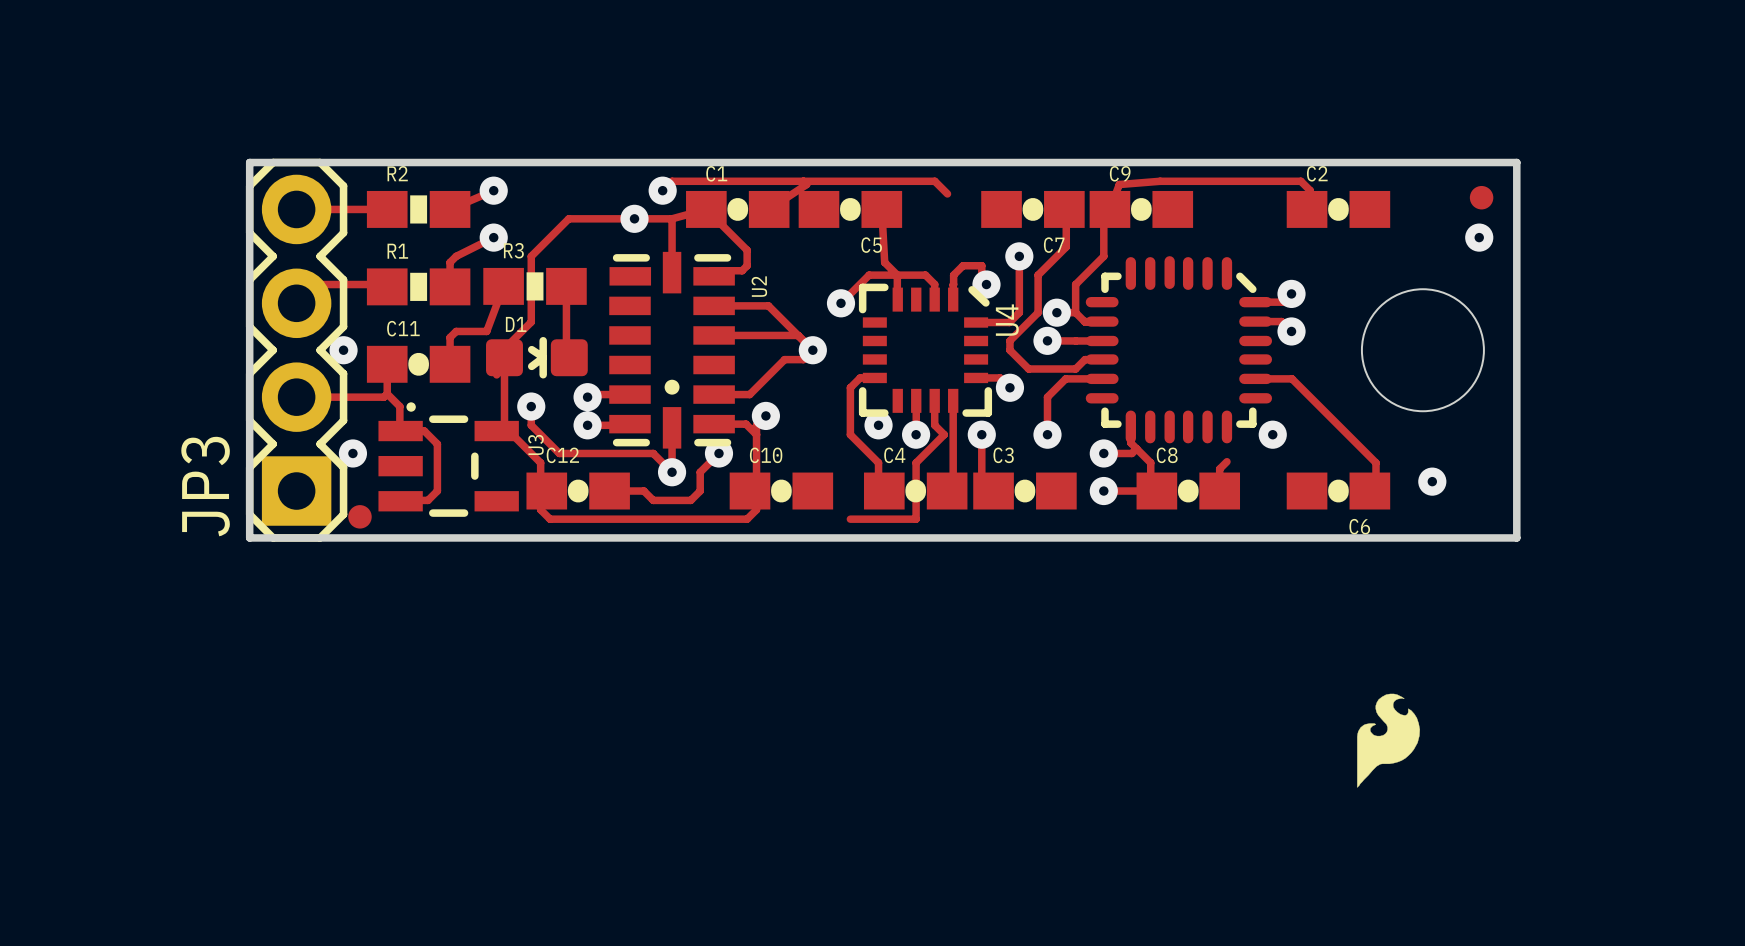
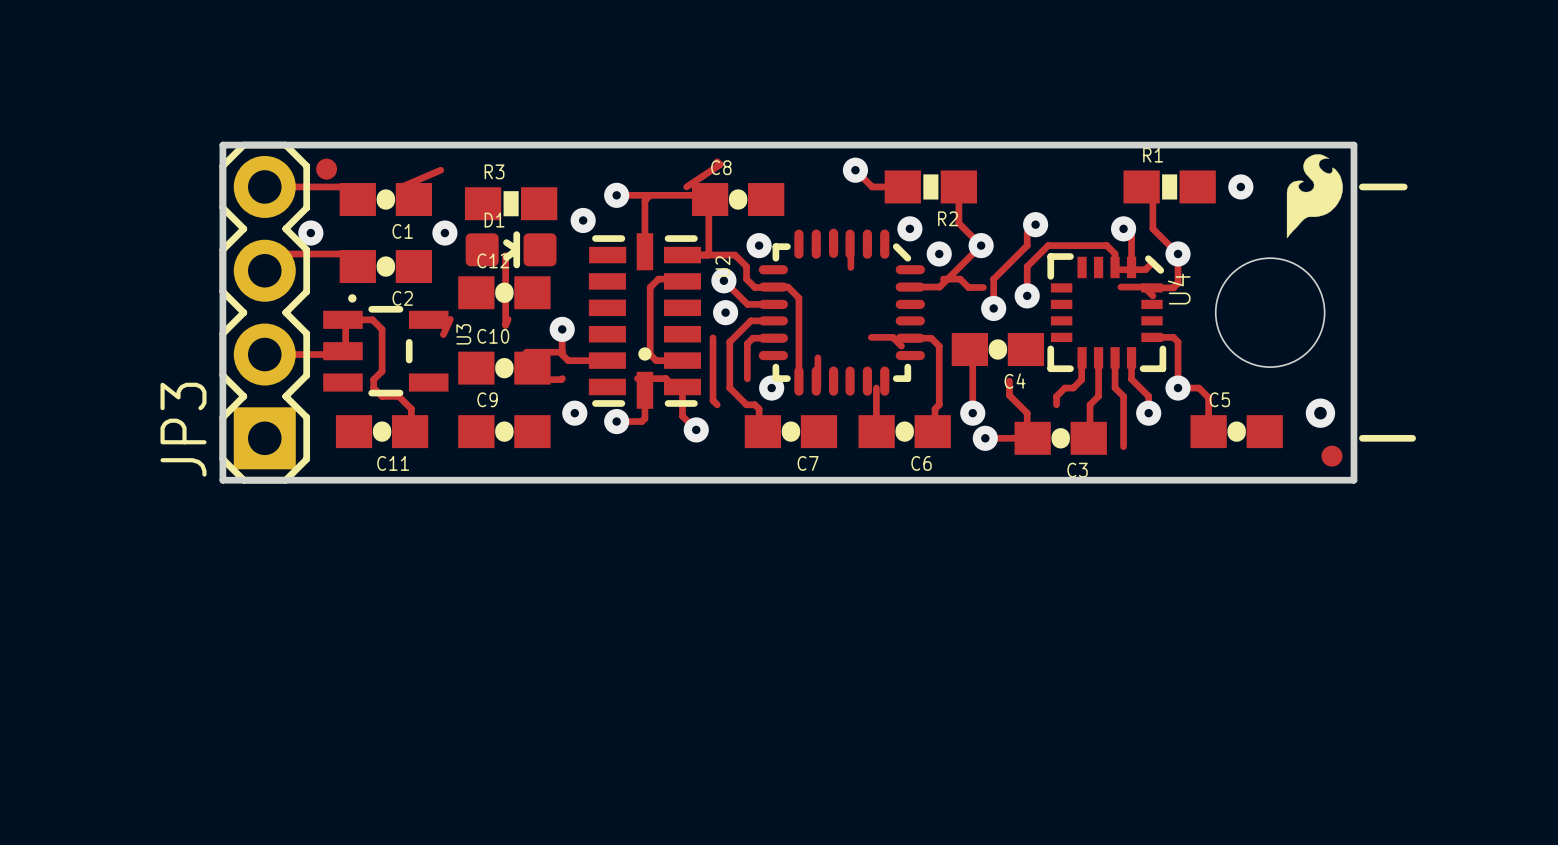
R2 name position: R2 (397, 173) -> R2 (947, 218)
C1 name position: C1 (716, 173) -> C1 (402, 231)
C2 name position: C2 (1317, 173) -> C2 (402, 298)
via: (493, 190) -> none
track: (662, 190) (672, 181) (934, 181) (947, 193) -> none
via: (662, 190) -> none
track: none -> (855, 170) (872, 186) (902, 186)
via: none -> (855, 170)
part position: (1481, 197) -> (1331, 456)
R2 position: (418, 209) -> (930, 186)
C1 position: (737, 209) -> (385, 199)
C5 position: (850, 209) -> (1236, 431)
track: (881, 209) (884, 262) (897, 275) (897, 299) -> none
C7 position: (1032, 209) -> (790, 431)
track: (1064, 209) (1066, 211) (1066, 246) (1038, 275) (1038, 312) (1009, 340) (1009, 350) (1028, 369) (1075, 369) (1085, 359) (1102, 359) -> none
track: none -> (958, 186) (958, 223) (981, 245) (939, 287) (910, 287)
track: (1109, 209) (1119, 184) (1160, 181) (1300, 181) (1310, 190) (1310, 206) (1307, 209) -> none
track: (1109, 209) (1103, 215) (1103, 256) (1075, 284) (1075, 312) -> none
C9 position: (1141, 209) -> (504, 431)
track: none -> (1141, 186) (1152, 198) (1152, 228) (1178, 253) (1178, 283) (1173, 287) (1152, 287)
C2 position: (1338, 209) -> (385, 266)
via: none -> (1240, 186)
line: none -> (1362, 186) (1404, 186)
via position: (634, 218) -> (583, 220)
track: (672, 218) (568, 218) (531, 256) (531, 322) (504, 348) (504, 423) (496, 431) (508, 431) (540, 462) (540, 484) (546, 491) (540, 497) (540, 509) (550, 519) (747, 519) (756, 509) (756, 425) (765, 415) -> none
track: (672, 218) (706, 209) (747, 250) (747, 265) (742, 270) (711, 270) (714, 276) -> none
track: (672, 218) (672, 272) -> none
track: none -> (616, 195) (705, 195) (710, 199) (701, 207)
via: none -> (616, 195)
track: none -> (650, 195) (644, 200) (644, 251)
C8: none -> (738, 199)
track: none -> (708, 200) (707, 255)
track: (493, 237) (456, 256) (450, 262) (450, 286) -> none
via position: (493, 237) -> (444, 233)
via: (1479, 237) -> none
C5 name position: C5 (871, 245) -> C5 (1219, 399)
track: none -> (1035, 224) (1027, 233) (1027, 245) (993, 279) (993, 308)
via: none -> (1035, 224)
track: (1019, 256) (1019, 312) (1009, 322) (976, 322) -> none
track: none -> (1123, 228) (1131, 236) (1131, 267)
via: none -> (1123, 228)
via: none -> (310, 233)
via: none -> (981, 245)
track: (953, 284) (953, 275) (963, 265) (981, 265) (981, 279) (986, 284) -> none
via: (986, 284) -> none
track: none -> (682, 255) (735, 255) (746, 266) (746, 279) (754, 287) (772, 287)
R1 position: (418, 286) -> (1169, 186)
track: (503, 286) (486, 331) (456, 331) (450, 337) (450, 364) -> none
R3 position: (535, 286) -> (511, 203)
via position: (1291, 293) -> (1178, 253)
track: (934, 299) (934, 284) (925, 275) (869, 275) (841, 303) -> none
track: none -> (1115, 267) (1115, 253) (1106, 245) (1048, 245) (1027, 266) (1027, 295)
via position: (841, 303) -> (759, 245)
track: (714, 305) (768, 305) (812, 350) (803, 359) (784, 359) (749, 394) (714, 394) -> none
via position: (1056, 312) -> (939, 253)
track: none -> (723, 280) (747, 304) (773, 304)
via: none -> (723, 280)
track: none -> (682, 281) (680, 279) (658, 279) (650, 287) (650, 354) (656, 360) (682, 360)
track: none -> (773, 287) (787, 287) (798, 298) (798, 381)
C11 name position: C11 (403, 328) -> C11 (393, 463)
via: none -> (1027, 295)
via: (1291, 331) -> none
track: (714, 335) (798, 335) -> none
track: (1047, 340) (1102, 340) -> none
via: (1047, 340) -> none
via: none -> (993, 308)
part position: (1178, 349) -> (841, 312)
via: (343, 350) -> none
U2 position: (672, 350) -> (644, 321)
U4 position: (925, 350) -> (1106, 312)
D1 position: (536, 357) -> (511, 249)
track: none -> (342, 319) (372, 319) (382, 329) (382, 371) (373, 379) (373, 388) (382, 396) (398, 396) (411, 408) (410, 431)
track: none -> (773, 320) (750, 320) (729, 341) (729, 388) (746, 404) (754, 404) (759, 408) (759, 427) (762, 431)
C11 position: (418, 364) -> (382, 431)
track: none -> (562, 329) (562, 354) (568, 360) (607, 360)
via: none -> (562, 329)
track: (874, 377) (860, 377) (850, 387) (850, 434) (878, 462) (878, 485) (884, 491) -> none
track: none -> (1152, 337) (1173, 337) (1178, 341) (1178, 388) (1198, 388) (1208, 397) (1208, 431)
track: none -> (713, 337) (713, 400) (717, 404)
track: none -> (773, 338) (752, 338) (747, 343) (747, 378)
track: none -> (910, 338) (931, 338) (939, 346) (939, 404) (935, 408) (935, 429) (932, 431)
track: (1102, 378) (1065, 378) (1047, 397) (1047, 434) -> none
track: (1255, 378) (1292, 378) (1376, 462) (1376, 484) (1369, 491) -> none
via: (1009, 387) -> none
track: none -> (969, 349) (972, 352) (972, 413)
track: (387, 393) (399, 406) (400, 431) (424, 431) (437, 444) (437, 491) (428, 500) (400, 501) -> none
via: (587, 397) -> none
track: (934, 400) (934, 425) (944, 434) (916, 462) (916, 519) (850, 519) -> none
track: (953, 400) (953, 484) (947, 491) -> none
track: none -> (1098, 357) (1098, 396) (1090, 404) (1088, 431)
track: none -> (1115, 357) (1115, 387) (1123, 396) (1123, 446)
track: none -> (1131, 357) (1131, 379) (1148, 396) (1148, 413)
track: none -> (1081, 358) (1081, 379) (1073, 388) (1064, 388) (1056, 396) (1056, 404)
track: (531, 406) (531, 425) (559, 453) (653, 453) (672, 472) (672, 427) -> none
via: (531, 406) -> none
via: (765, 415) -> none
via: (587, 425) -> none
via position: (878, 425) -> (771, 388)
track: none -> (682, 386) (682, 416) (696, 429)
via: (916, 434) -> none
via: (981, 434) -> none
via: (1047, 434) -> none
via position: (1272, 434) -> (1148, 413)
via: none -> (1178, 388)
track: none -> (644, 390) (644, 418) (641, 421) (616, 421)
track: (1136, 448) (1131, 453) (1103, 453) -> none
via: (352, 453) -> none
track: (718, 453) (700, 472) (700, 491) (690, 500) (653, 500) (643, 491) (609, 491) -> none
via: (718, 453) -> none
via position: (1103, 453) -> (972, 413)
C4 name position: C4 (894, 455) -> C4 (1015, 381)
C8 name: C8 (1167, 455) -> C3 (1077, 470)
U3 position: (448, 459) -> (385, 345)
track: (1226, 461) (1219, 468) (1219, 491) -> none
via: none -> (574, 413)
via: none -> (1320, 413)
via: (672, 472) -> none
via: none -> (616, 421)
via: none -> (696, 429)
via: (1432, 481) -> none
C12 position: (578, 491) -> (504, 292)
C10 position: (781, 491) -> (504, 368)
C4 position: (915, 491) -> (997, 349)
C3: (1024, 491) -> none
C6 position: (1338, 491) -> (904, 431)
line: none -> (1362, 438) (1412, 438)
part position: (359, 516) -> (326, 169)
drawing position: (1388, 740) -> (1314, 196)

